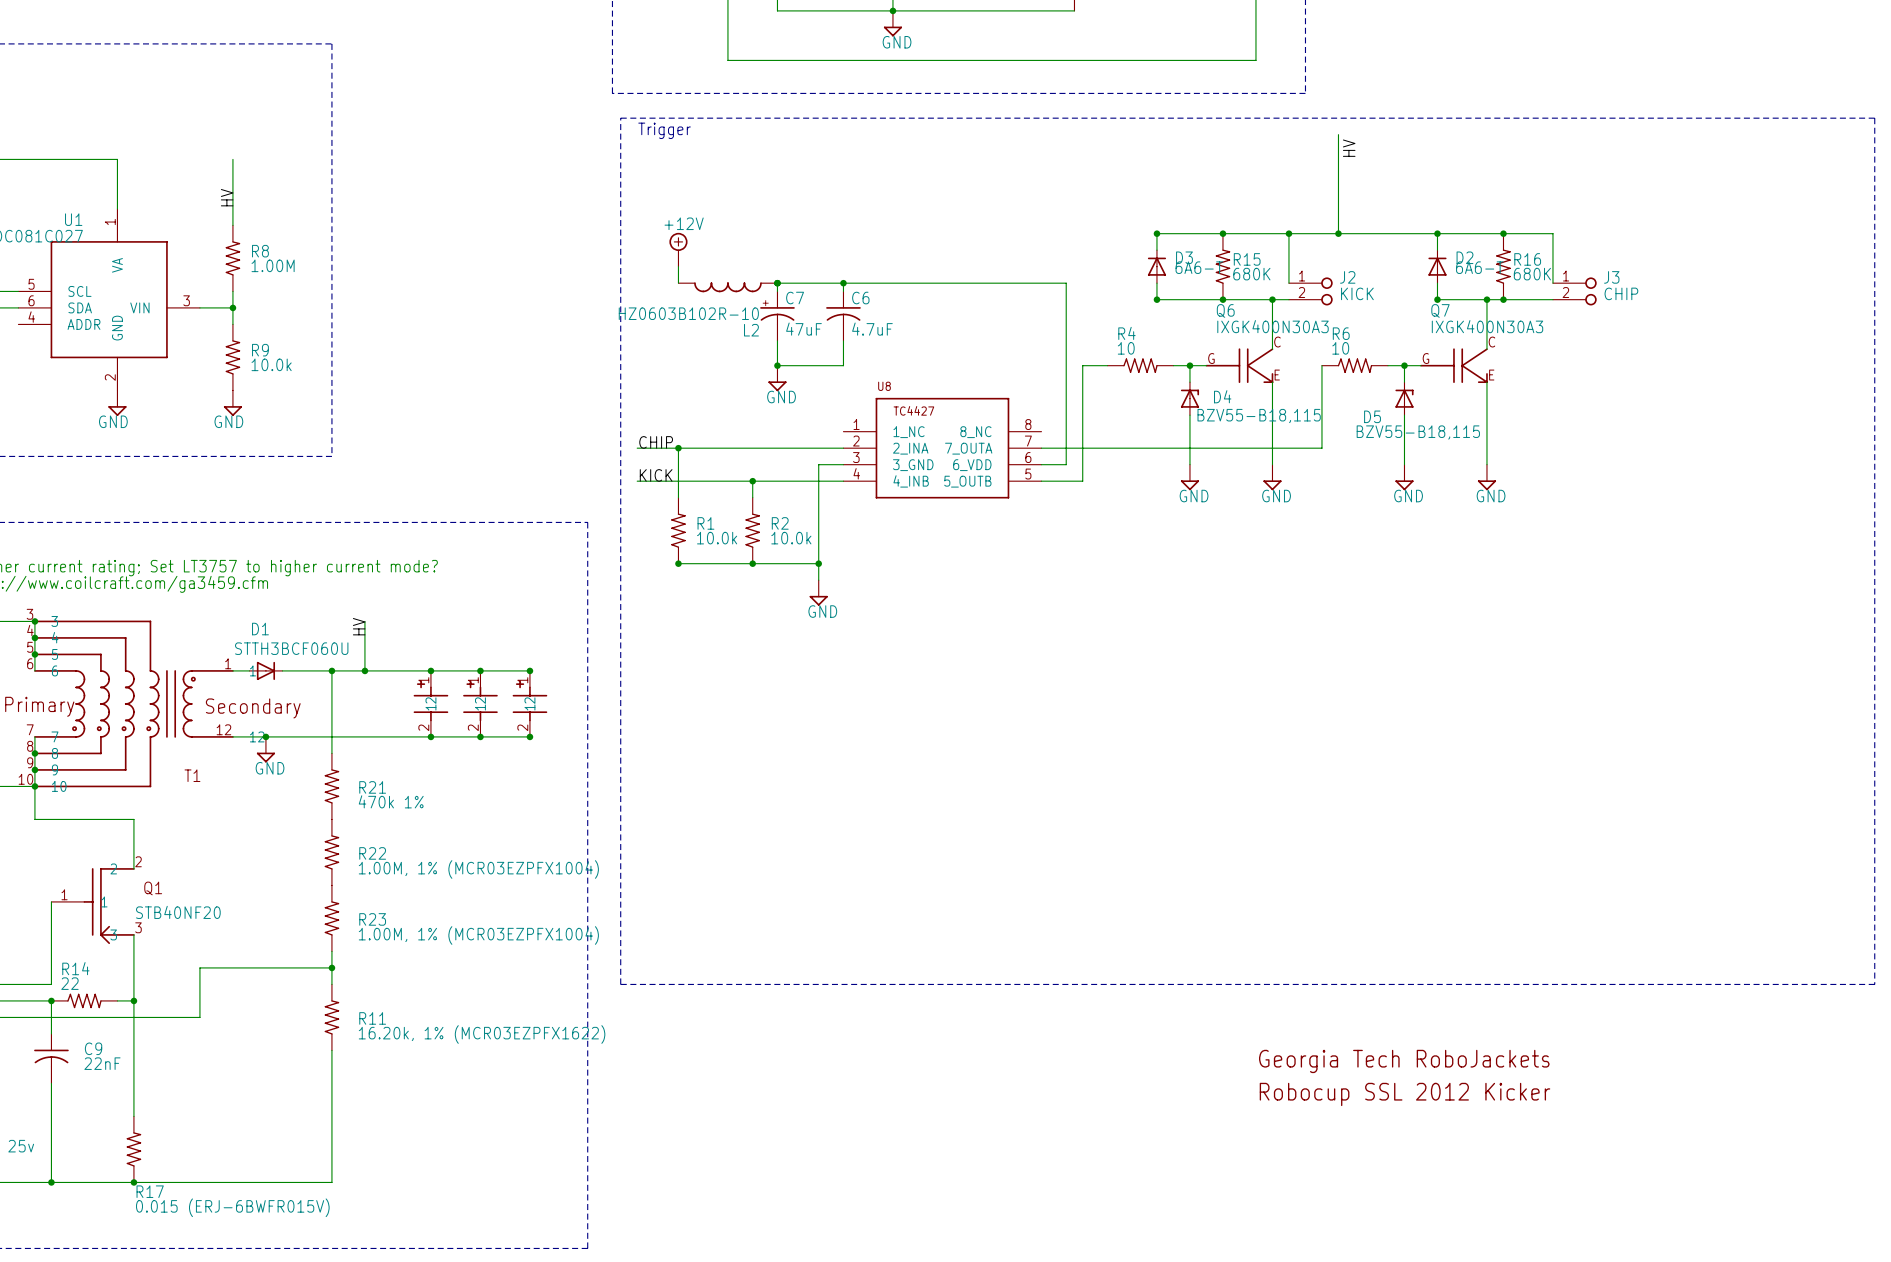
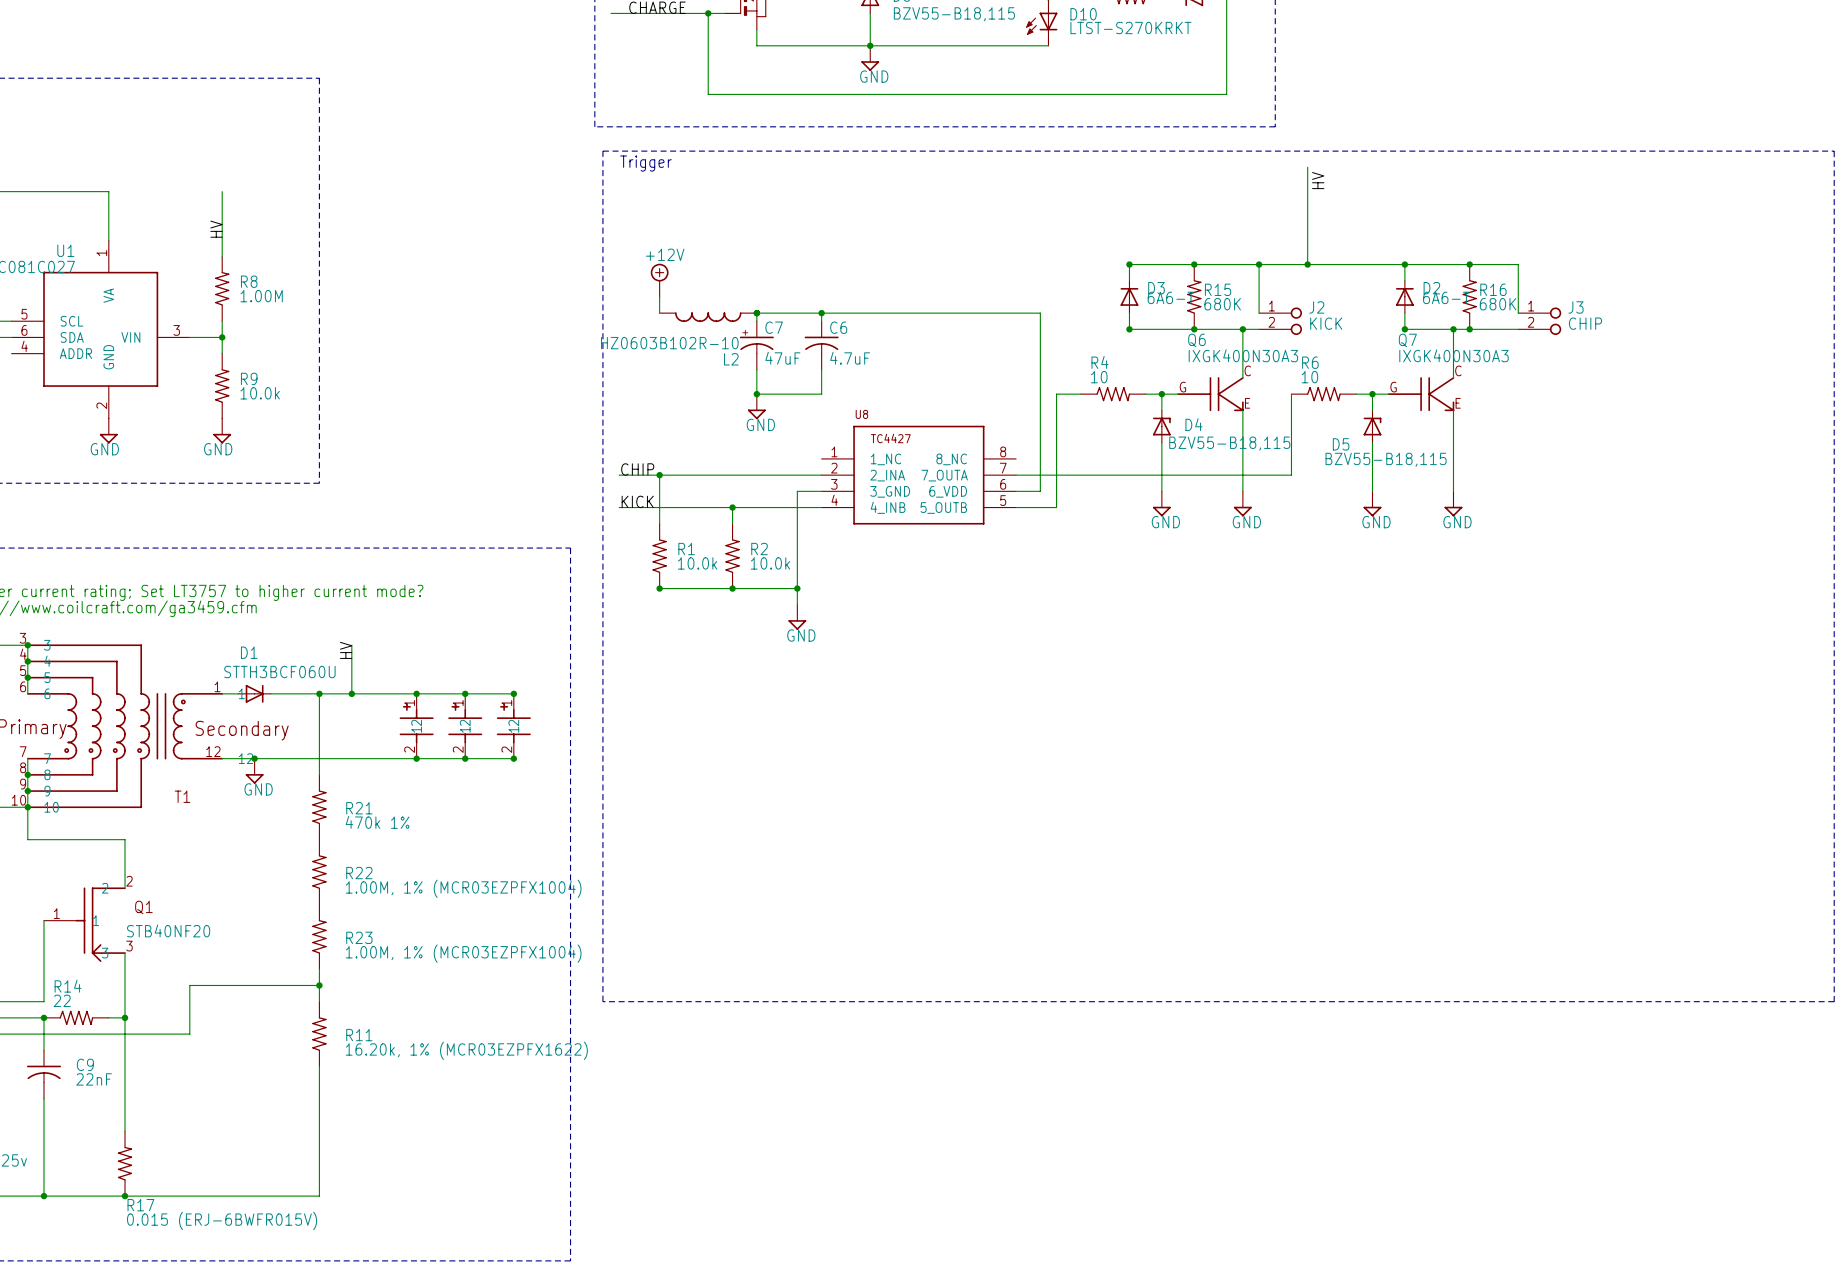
text: Georgia Tech RoboJackets (1404, 1061) -> none
text: Robocup SSL 2012 Kicker (1404, 1094) -> none

